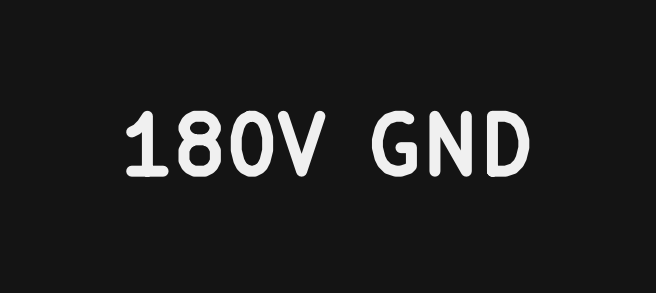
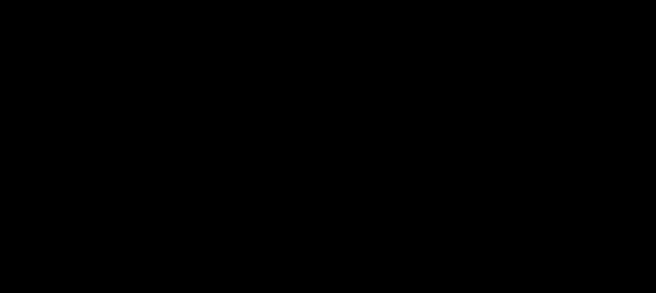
text: 180V GND (327, 143) -> none

